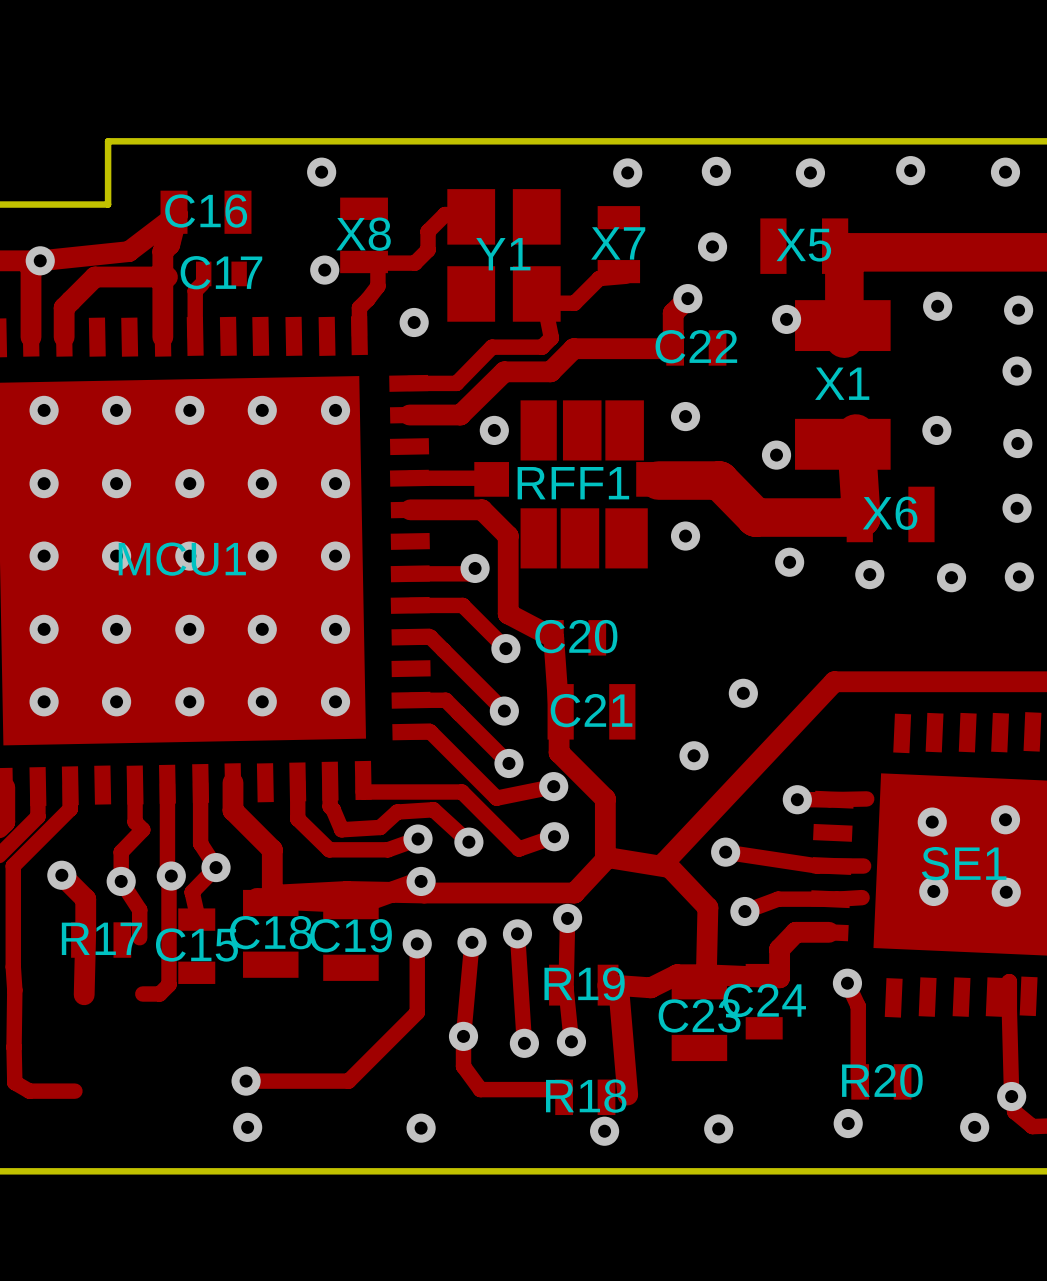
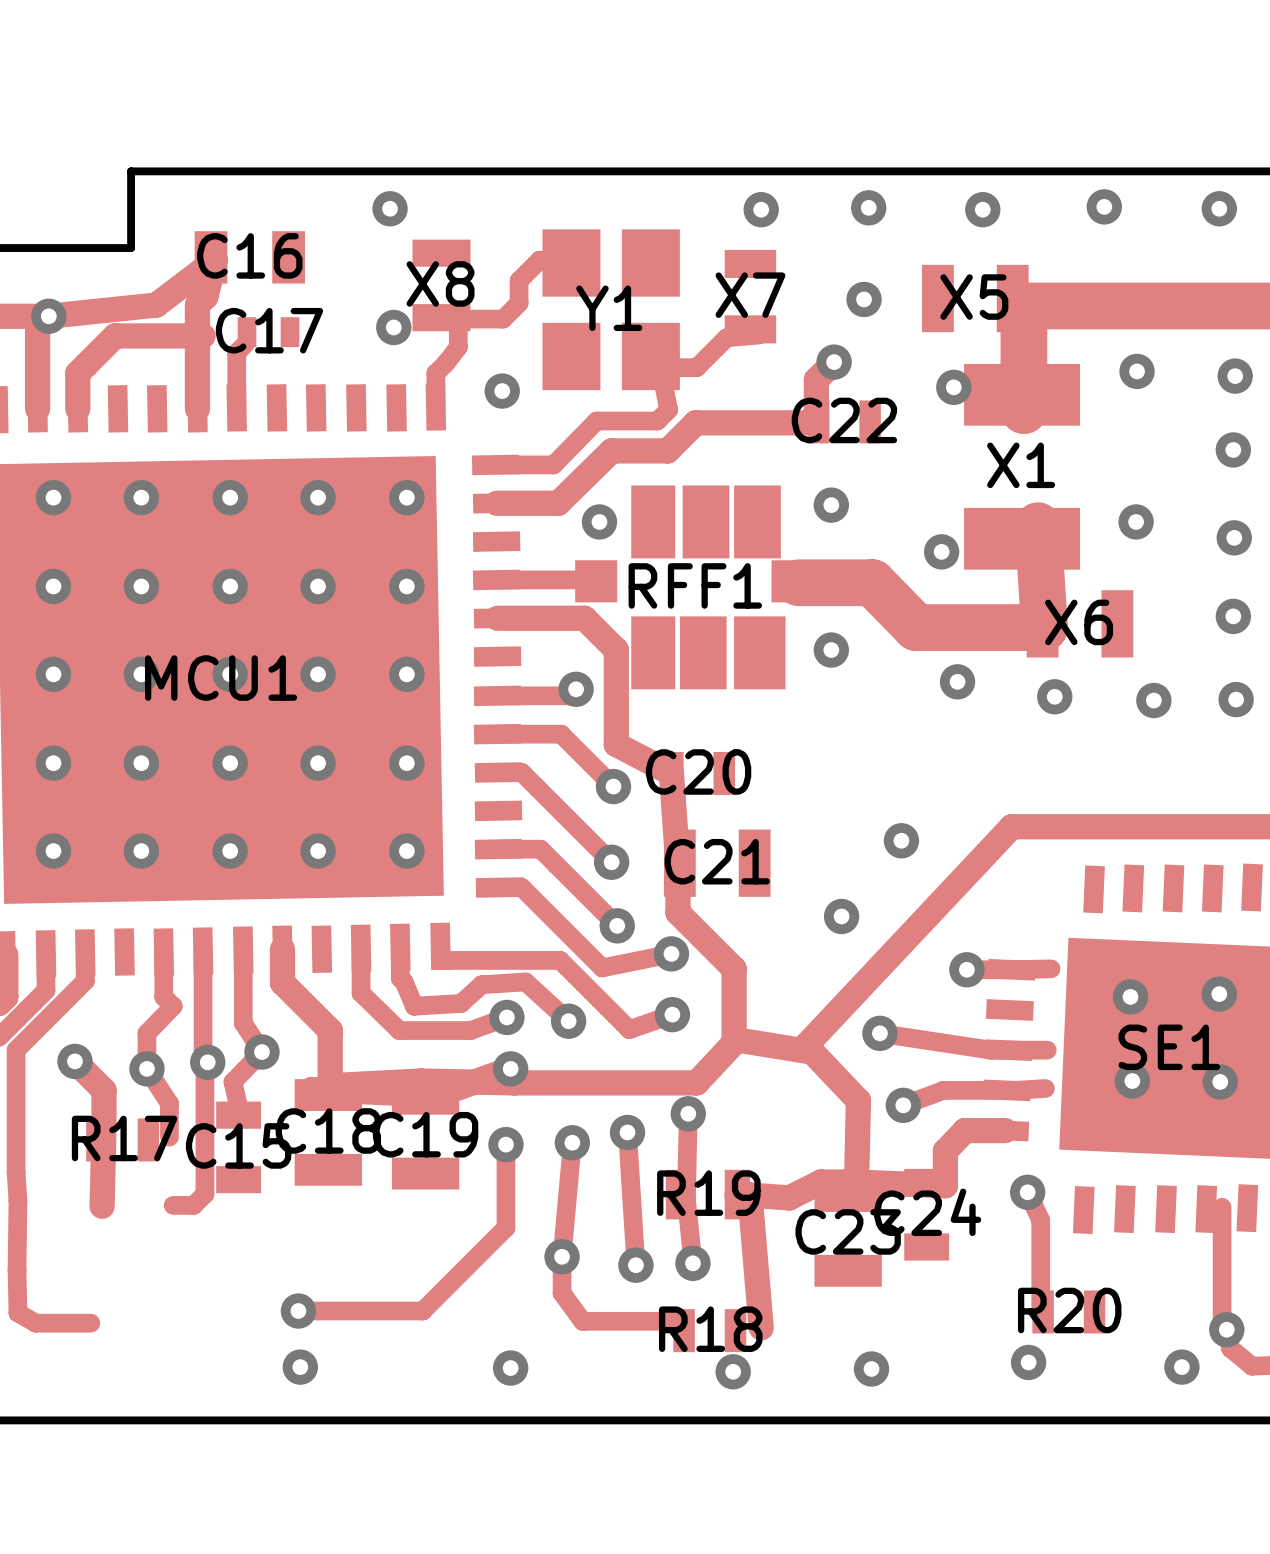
track: (994, 996) (1009, 981) (1011, 1096) -> (1222, 1207) (1222, 1325) (1226, 1329)

